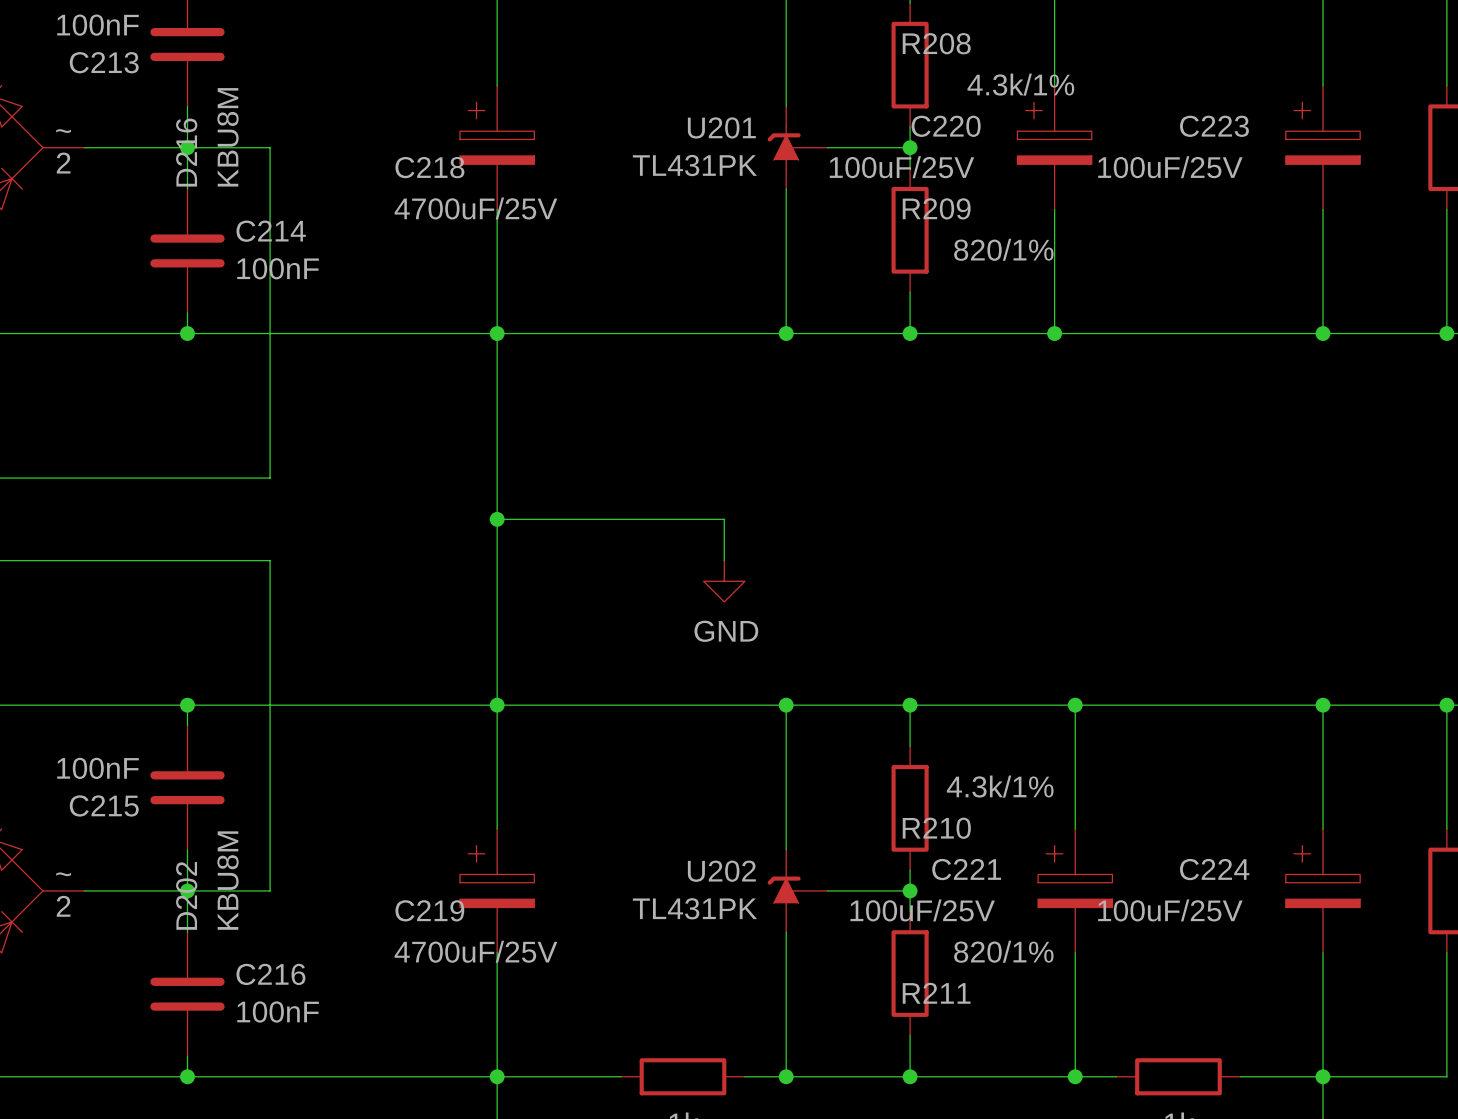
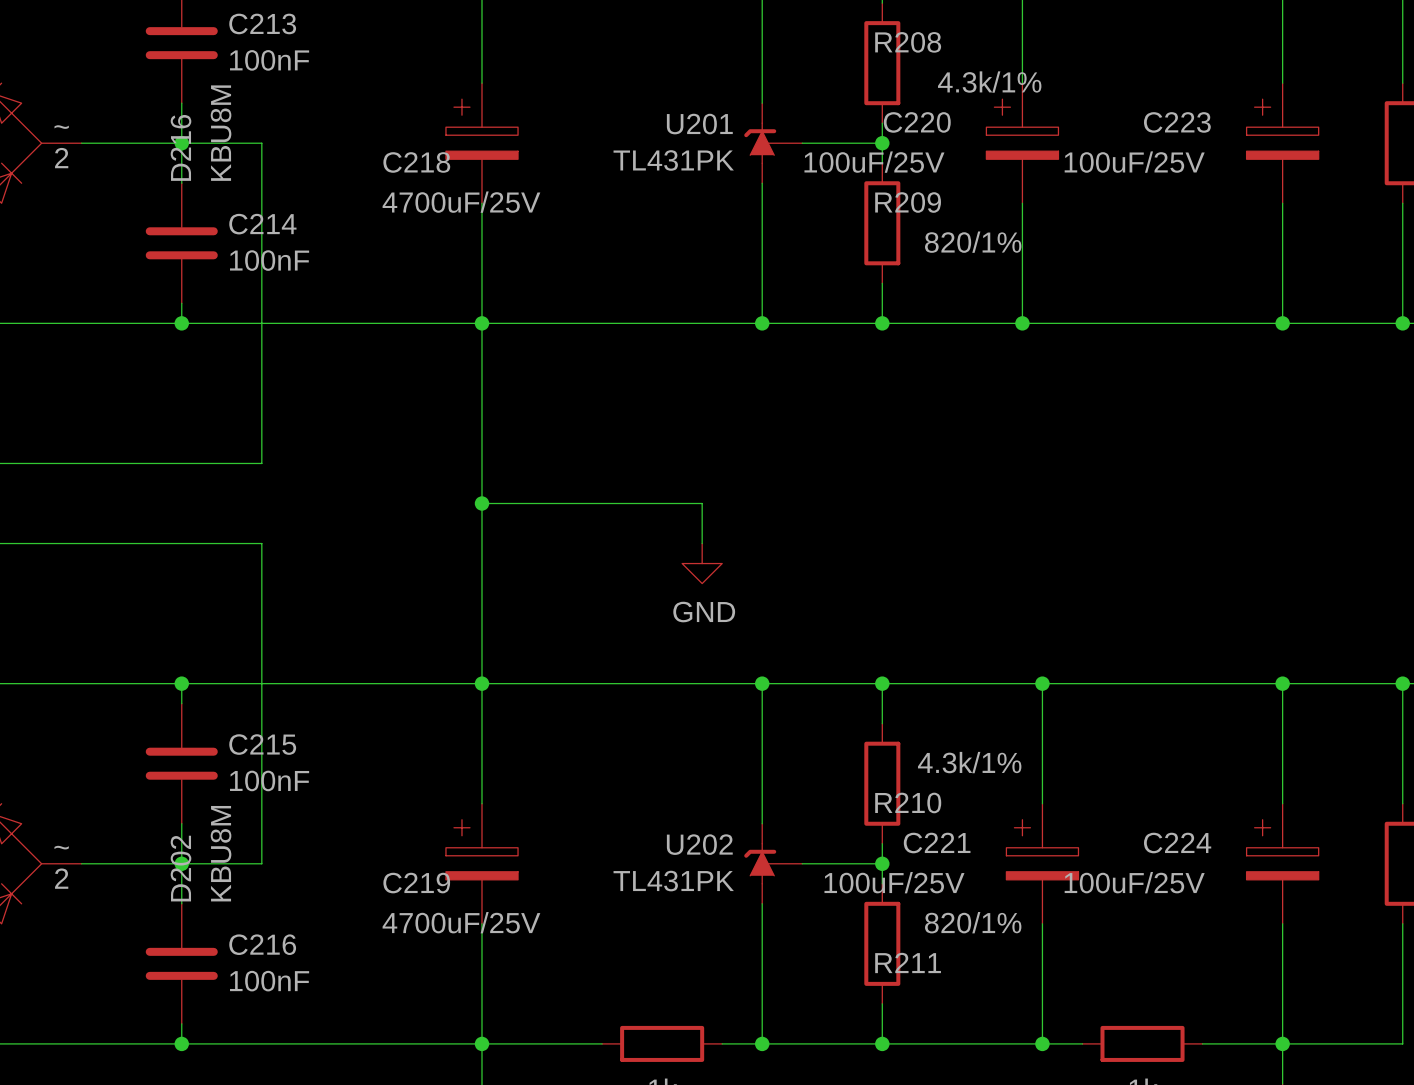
C213 value position: 100nF (97, 25) -> 100nF (269, 60)
C213 name position: C213 (104, 62) -> C213 (262, 23)
C215 value position: 100nF (97, 768) -> 100nF (269, 780)
C215 name position: C215 (104, 805) -> C215 (262, 744)

